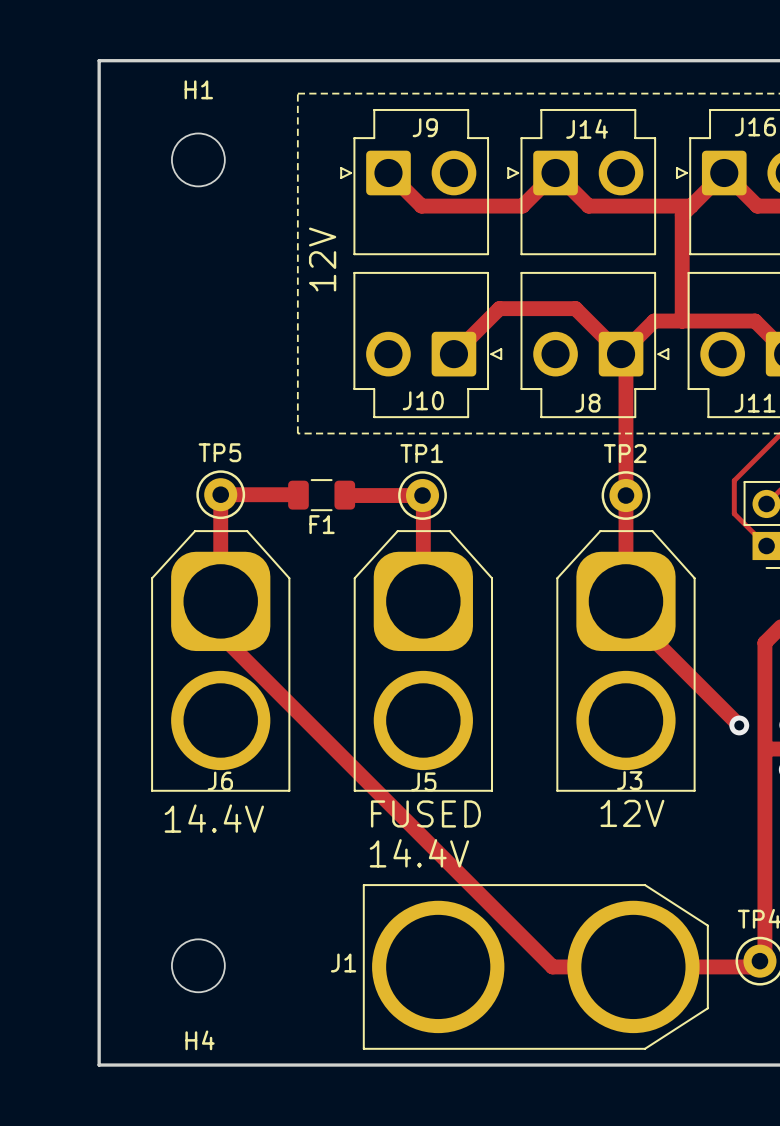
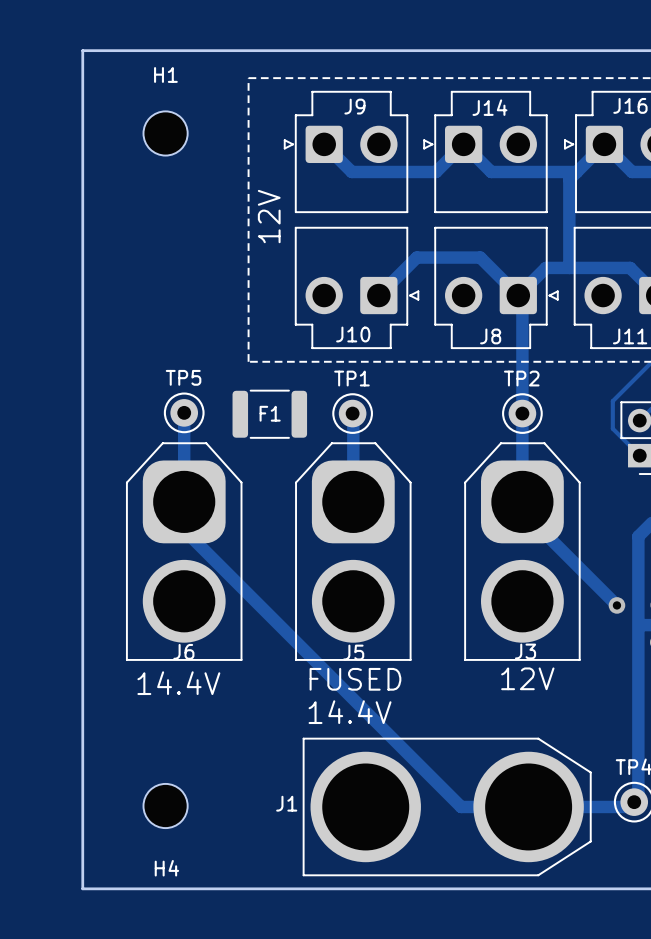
F1 footprint: [288, 479, 356, 512] -> [232, 389, 308, 439]
track: (220, 494) (298, 495) -> none
track: (422, 494) (344, 495) -> none

